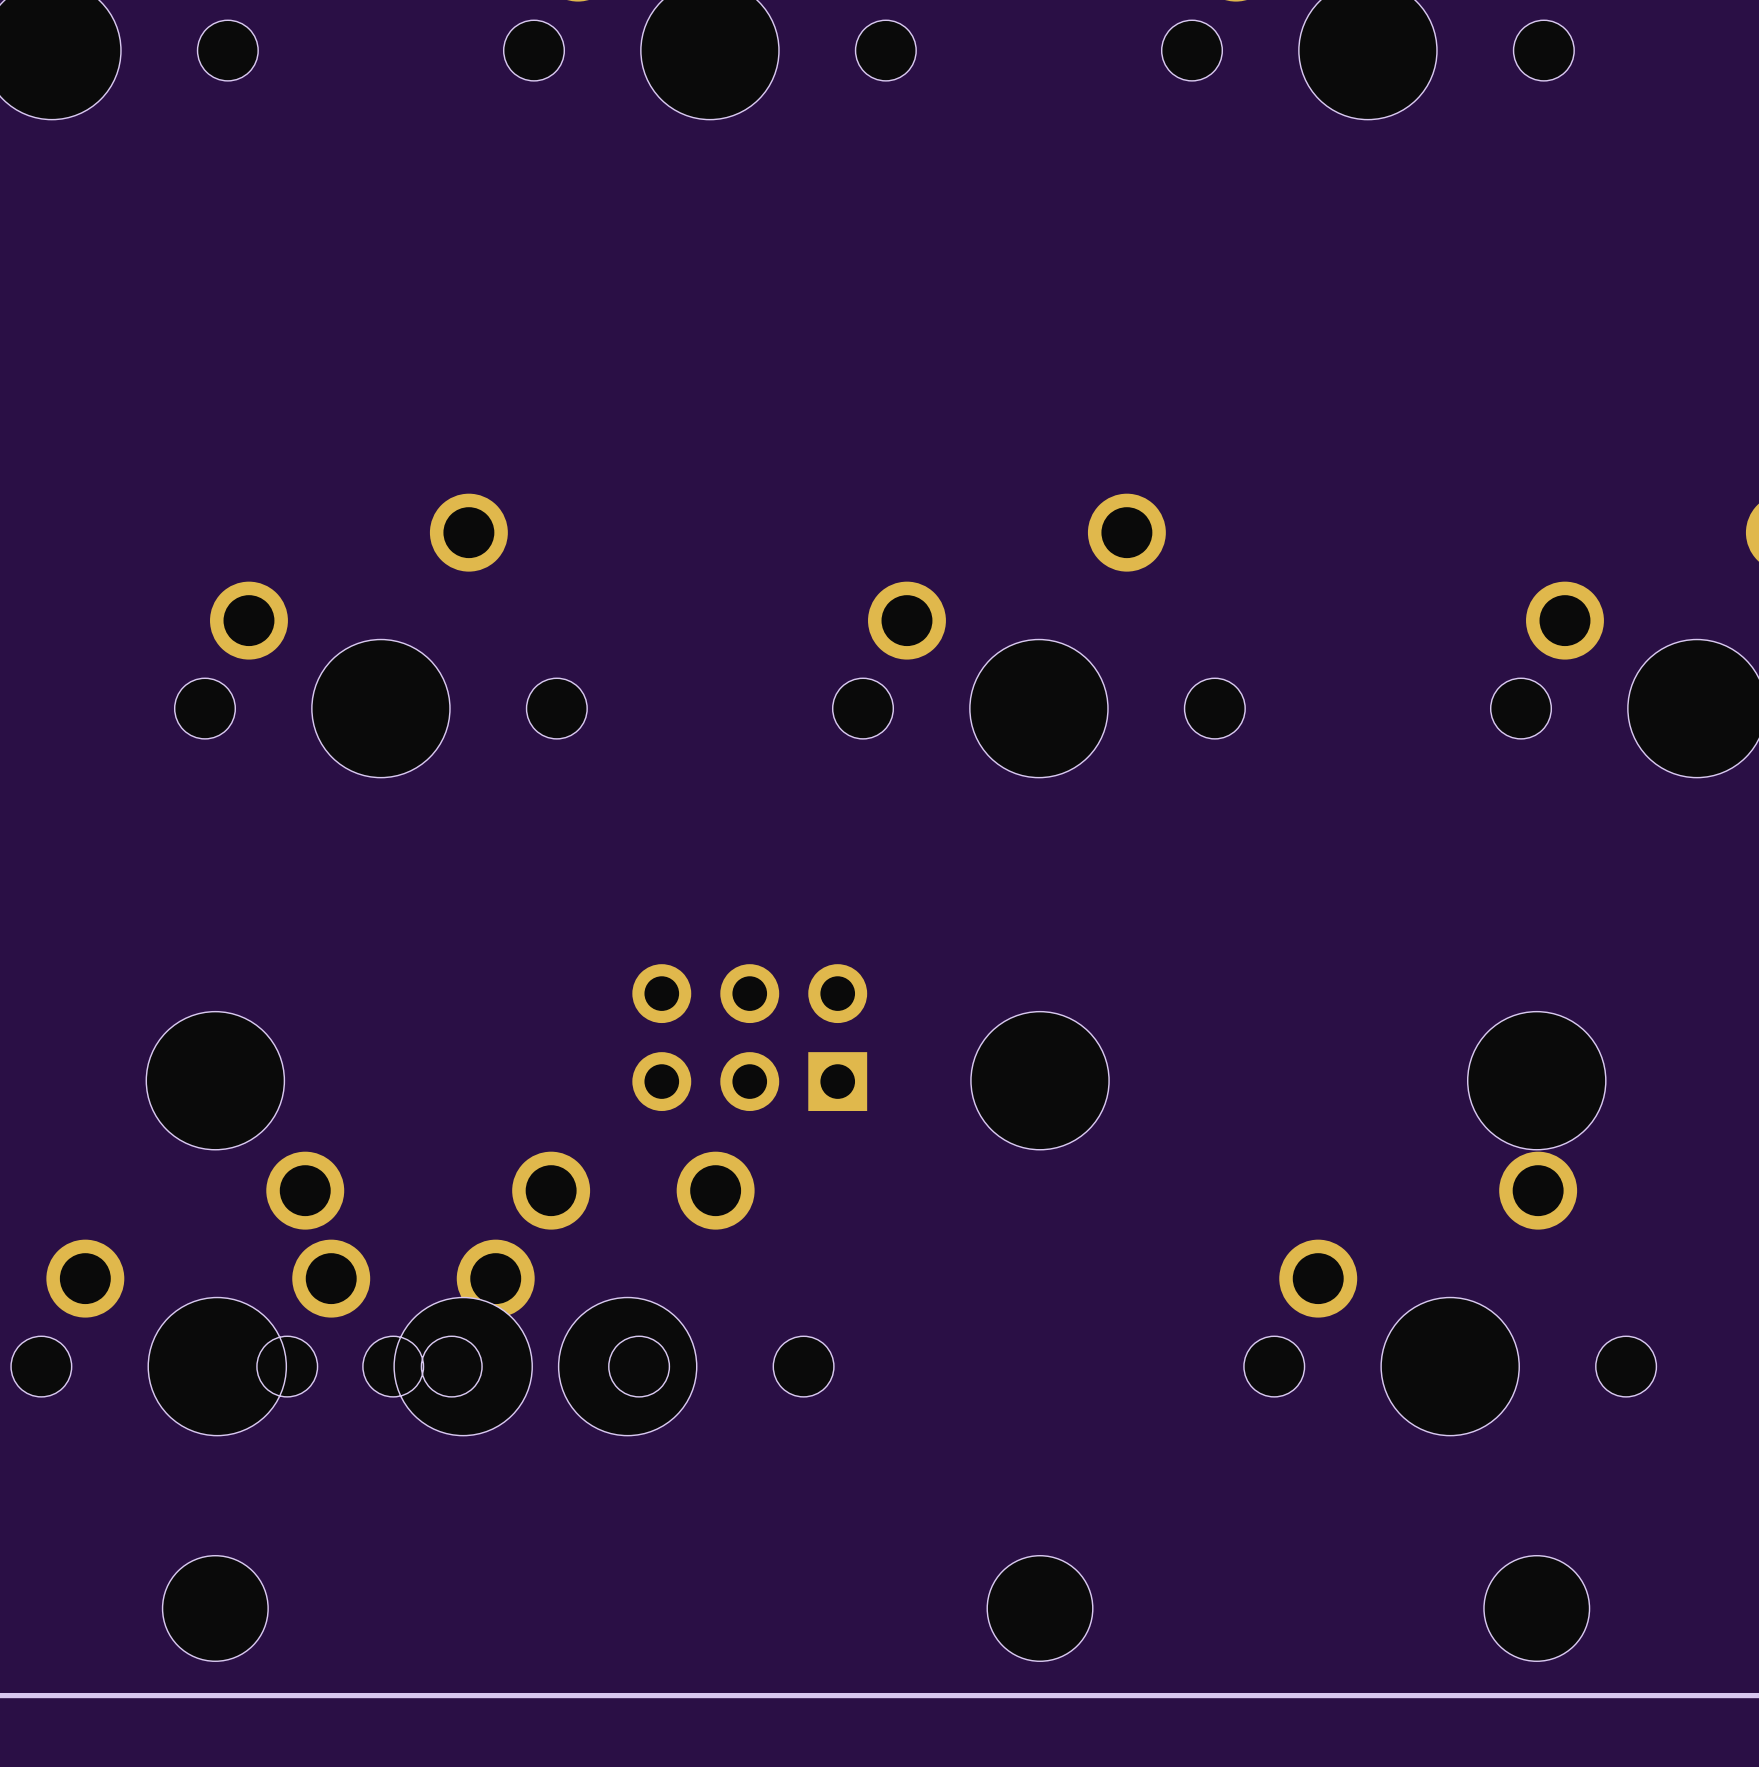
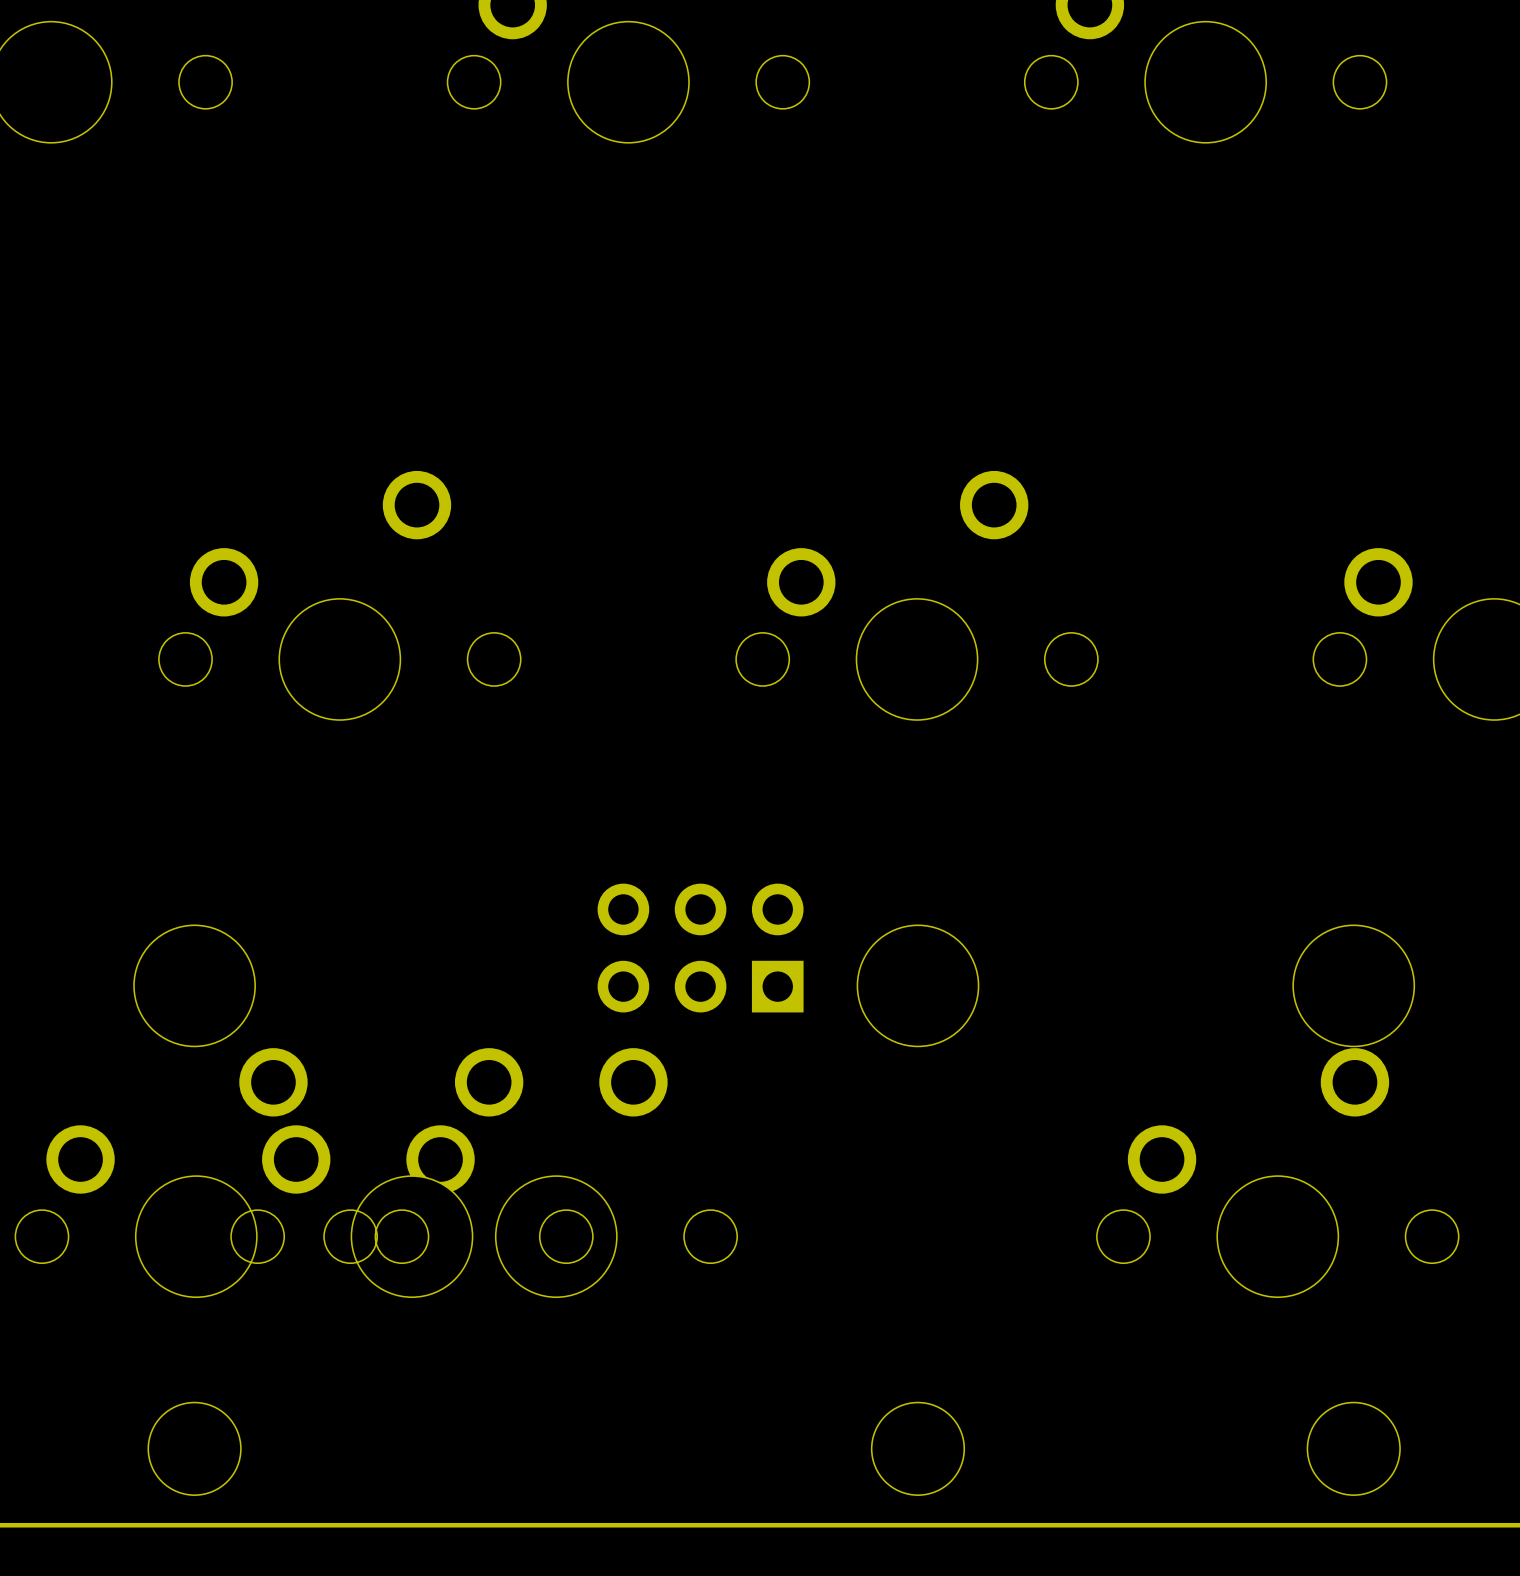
part position: (749, 1037) -> (700, 948)

